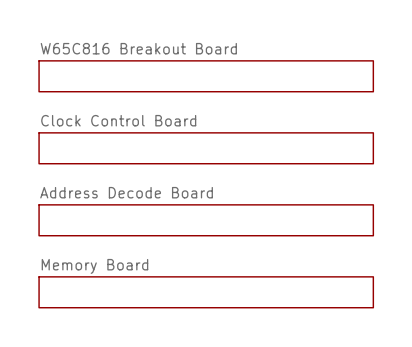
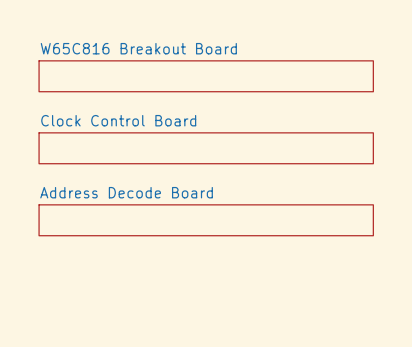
sheet Memory Board: (206, 292) -> none

